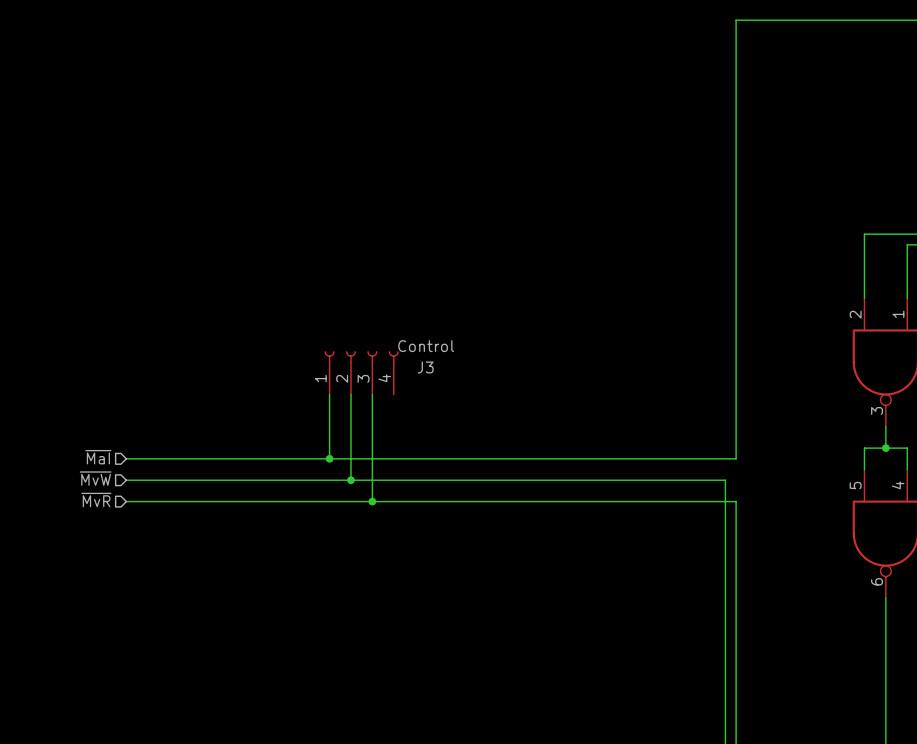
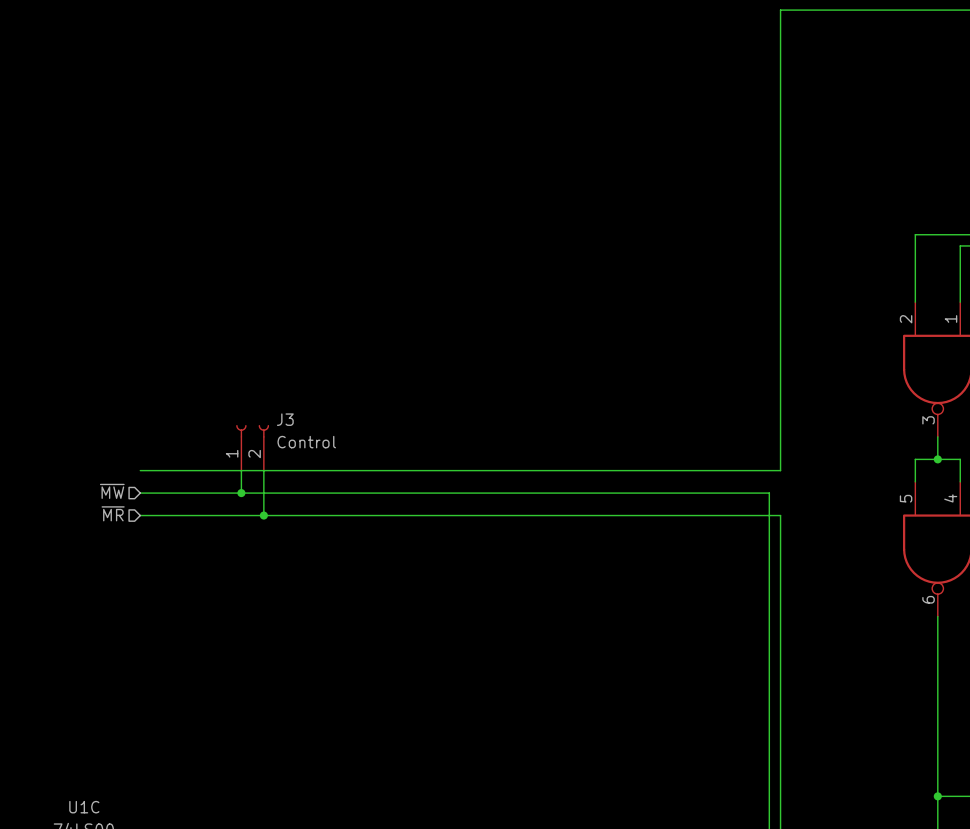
J3 value position: Control (426, 346) -> Control (306, 442)
J3 symbol: [324, 351, 399, 395] -> [236, 425, 270, 471]
J3 name position: J3 (425, 367) -> J3 (285, 419)
wire: (329, 394) (329, 458) -> none
wire: (350, 394) (350, 480) -> none
wire: (372, 394) (372, 501) -> none
hierarchical label: ~{MaI} (98, 457) -> none
wire: none -> (241, 470) (241, 493)
wire: none -> (263, 470) (263, 515)
junction: (329, 458) -> none
hierarchical label: ~{MvW} (95, 478) -> ~{MW} (112, 491)
junction: none -> (241, 493)
junction: (350, 480) -> none
hierarchical label: ~{MvR} (96, 499) -> ~{MR} (113, 513)
junction: none -> (263, 515)
junction: (372, 501) -> none

